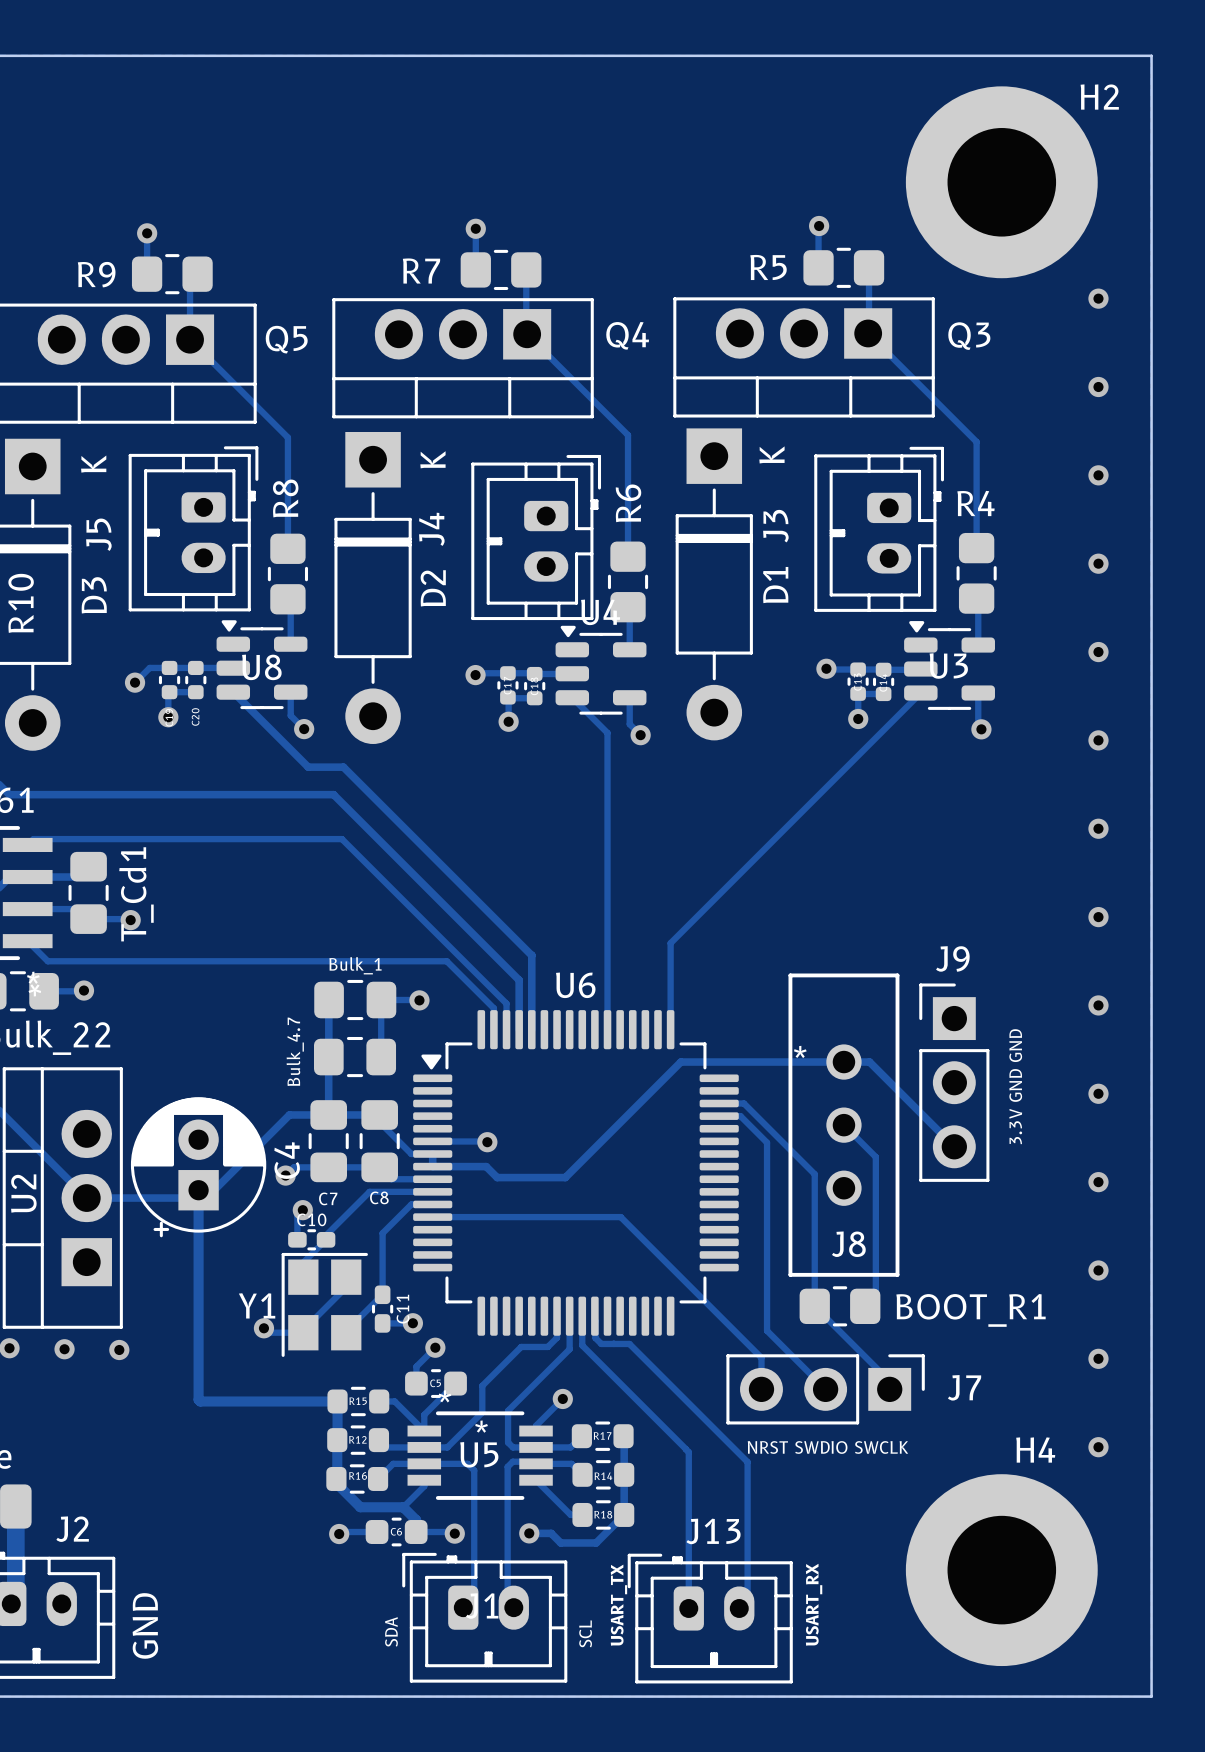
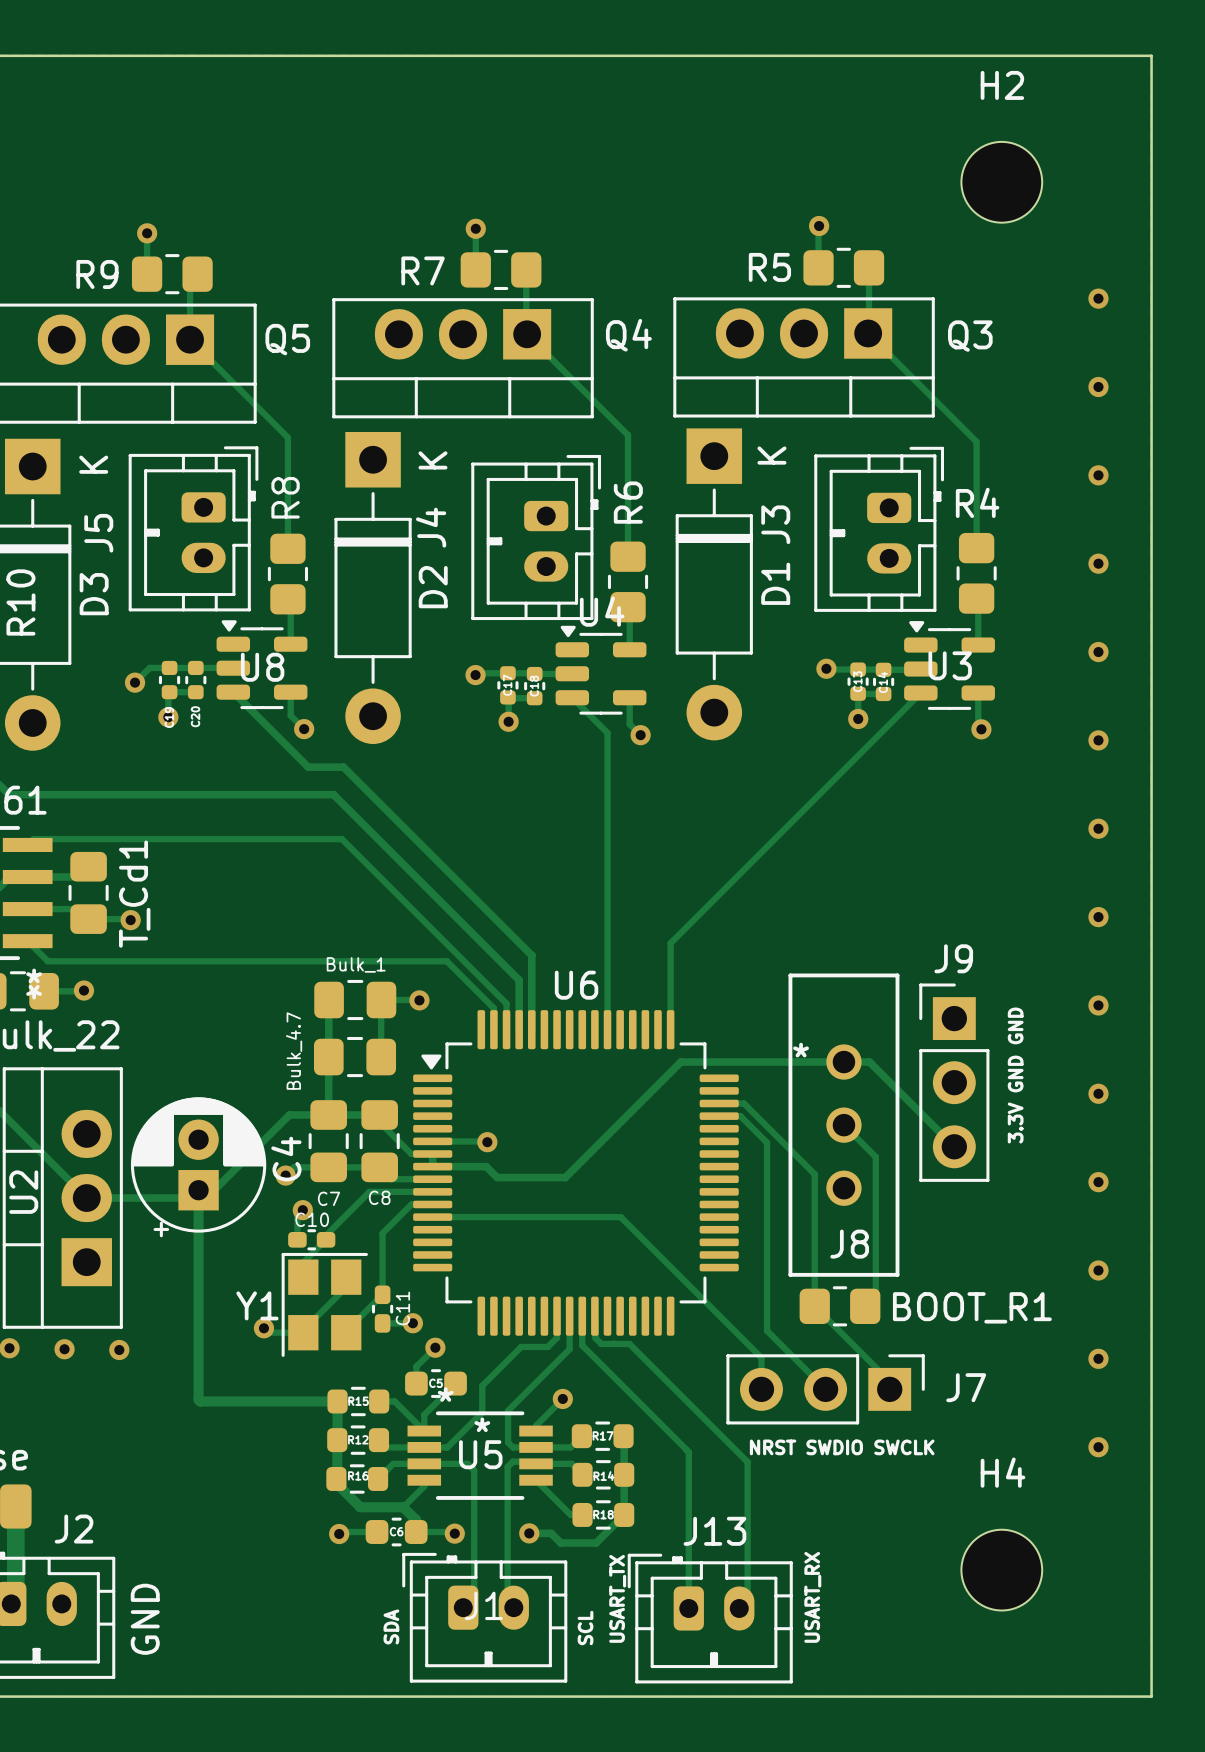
H2 footprint: [905, 86, 1098, 279] -> [961, 141, 1043, 223]
H2 name position: H2 (1099, 97) -> H2 (1002, 85)
H4 footprint: [905, 1474, 1098, 1667] -> [961, 1529, 1043, 1611]

